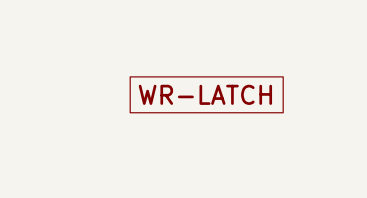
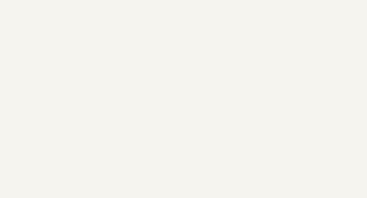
global label: WR-LATCH (205, 94) -> none

